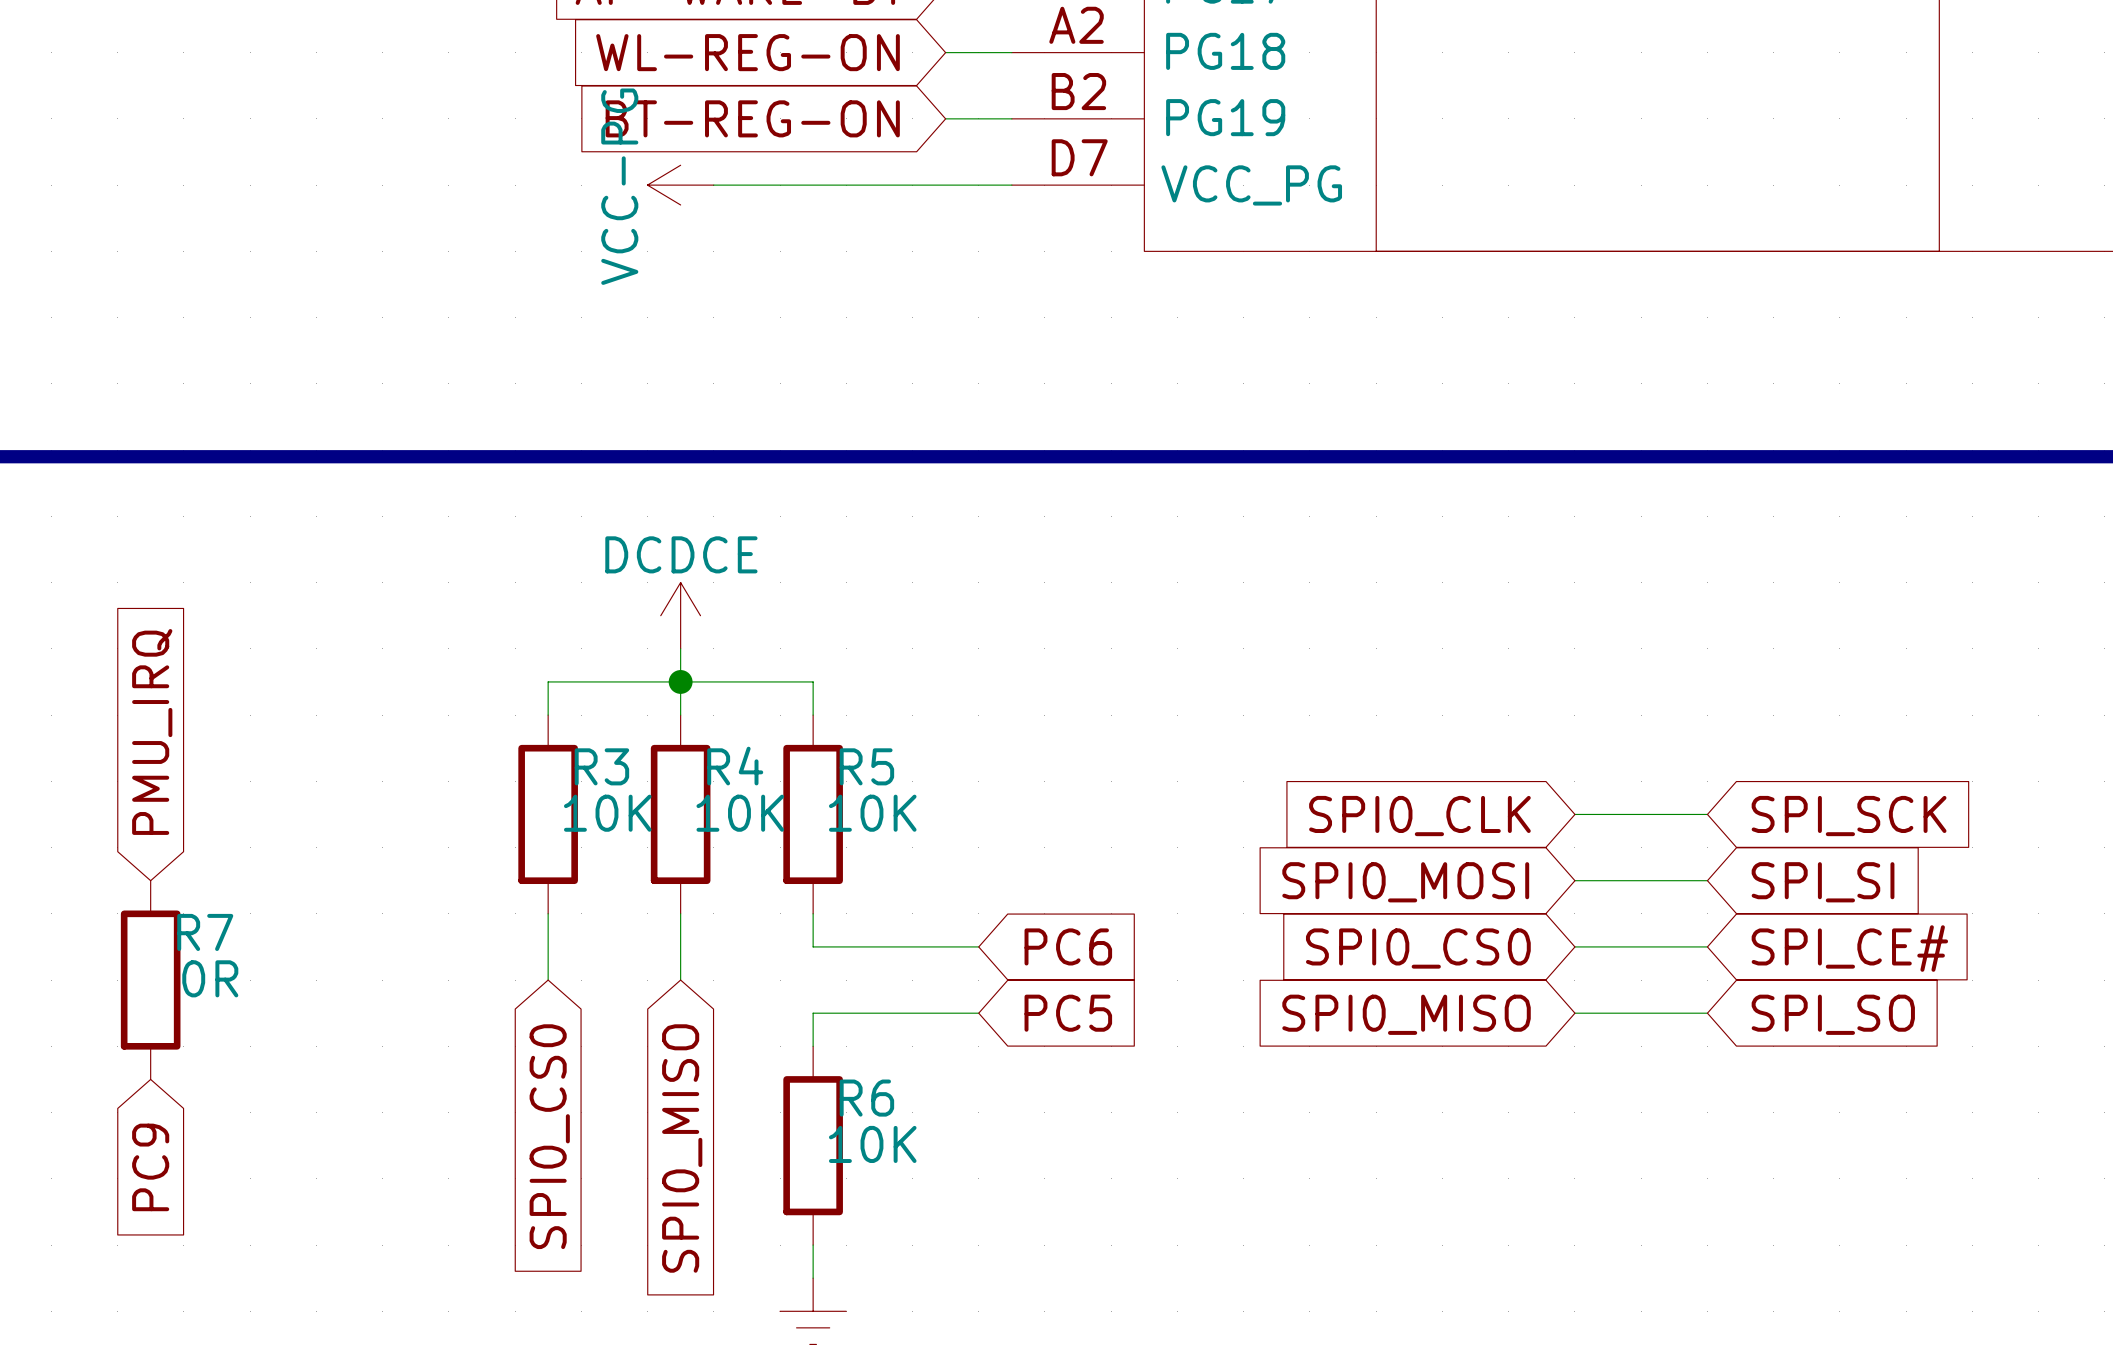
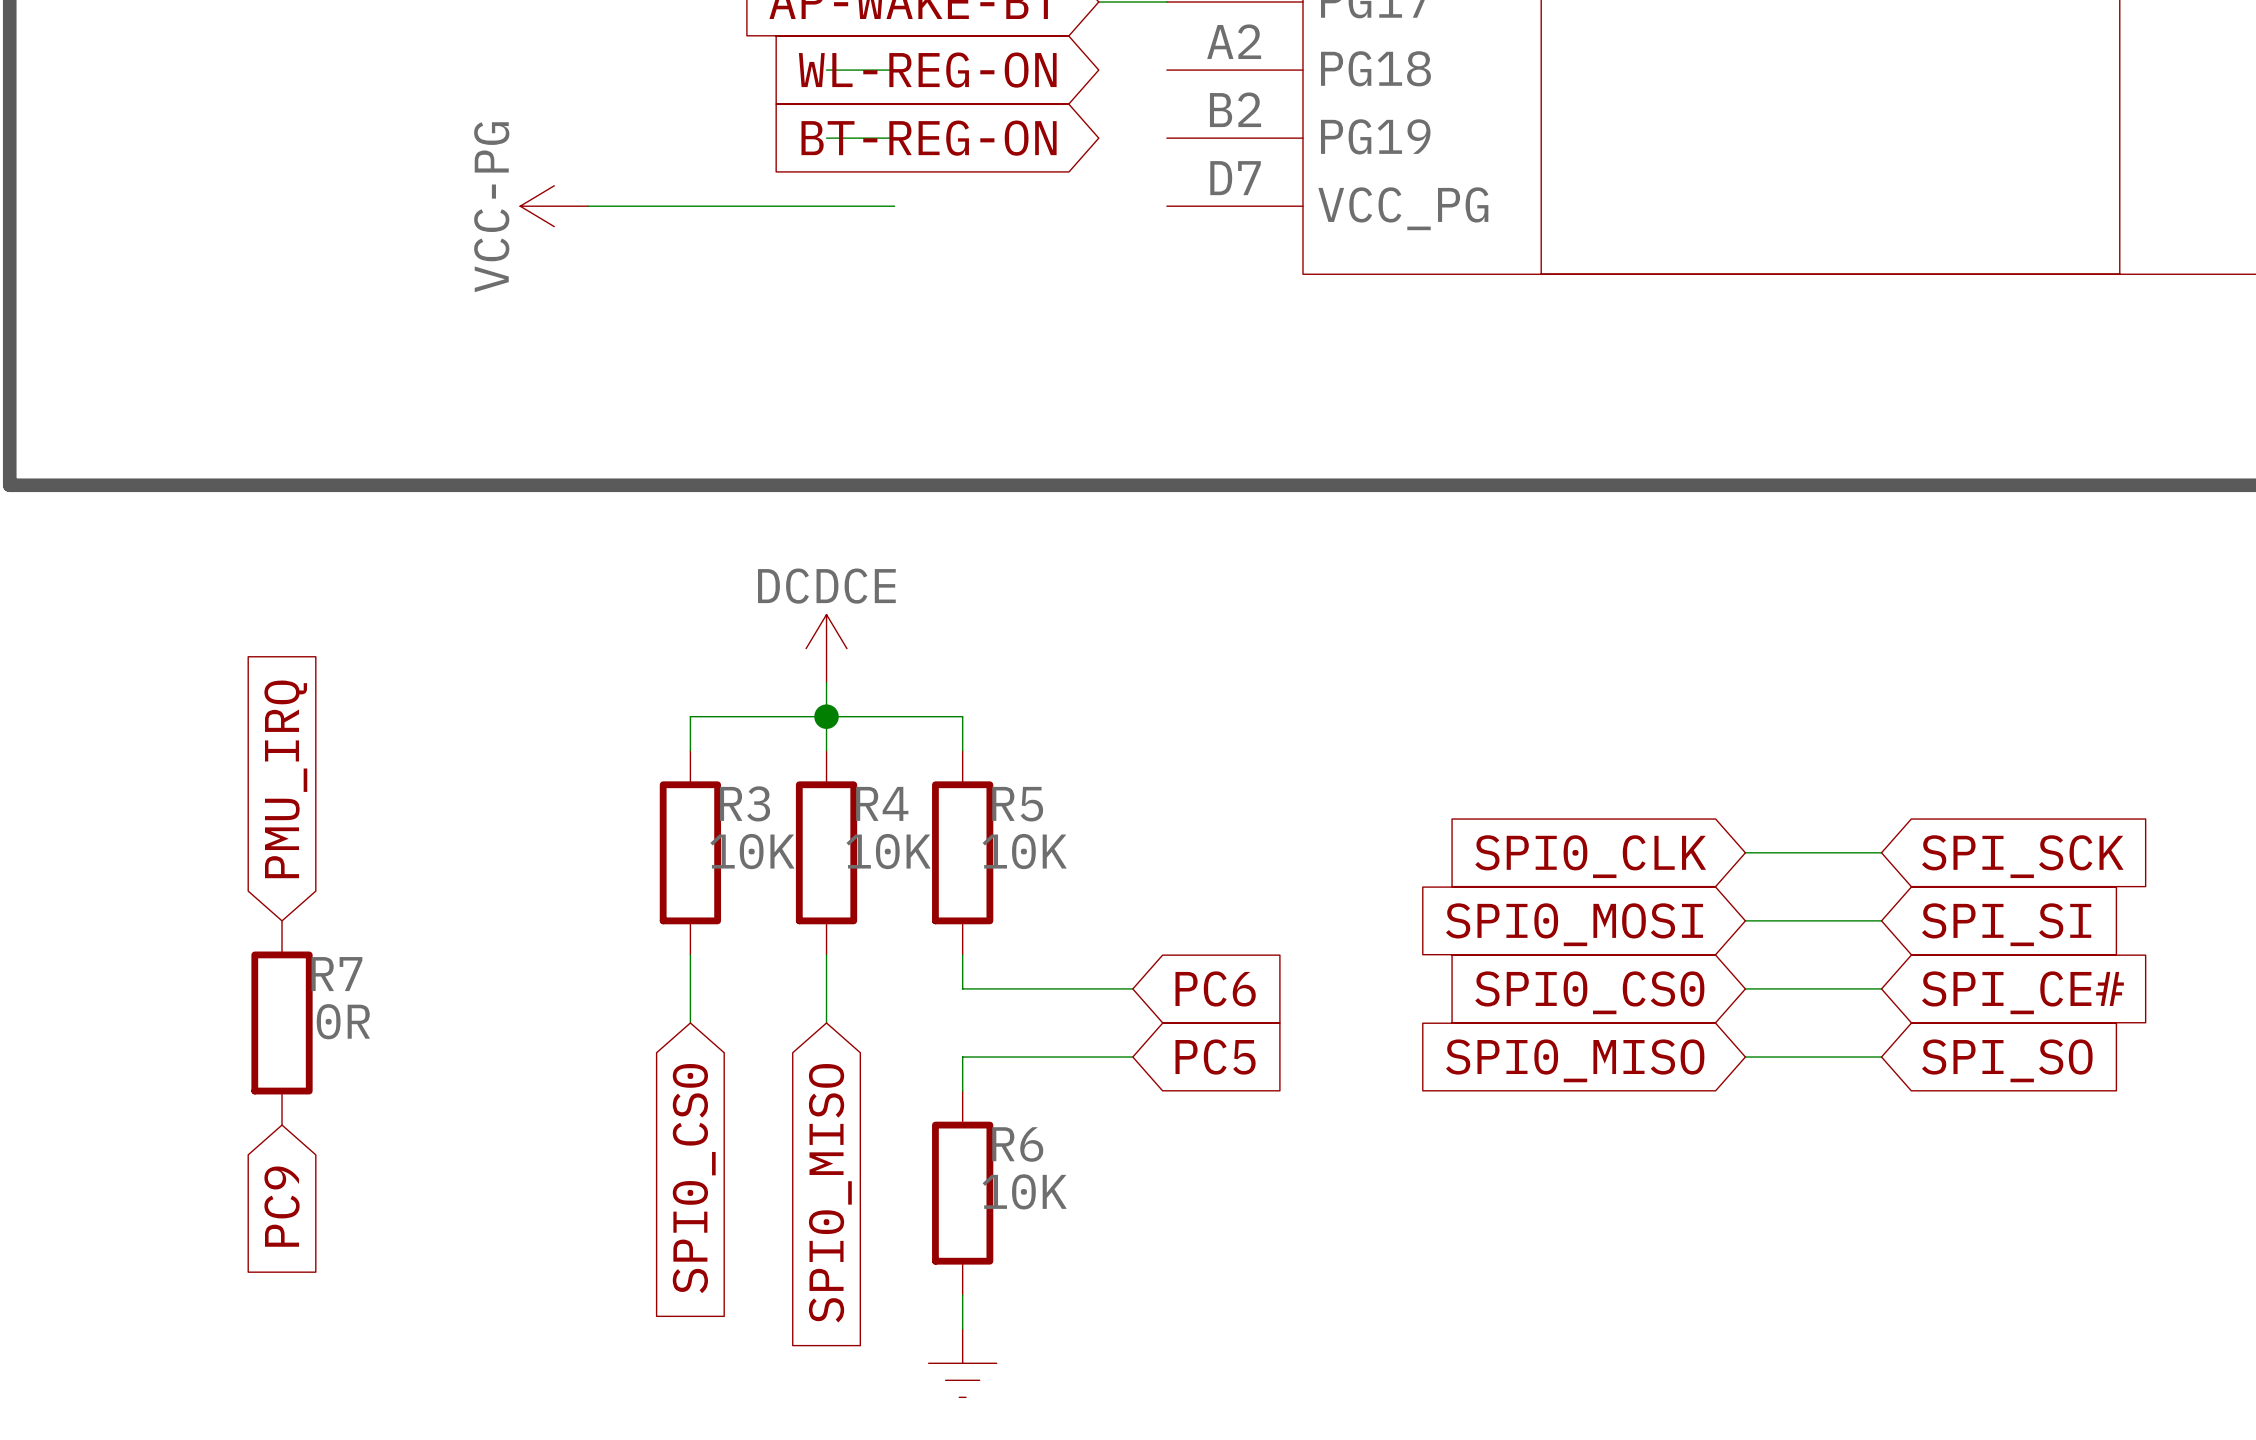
wire: (945, 52) (1011, 52) -> (826, 70) (894, 70)
wire: (945, 118) (1011, 118) -> (826, 138) (894, 138)
power symbol position: VCC-PG (680, 185) -> VCC-PG (554, 206)
wire: (746, 185) (1011, 185) -> (588, 206) (860, 206)

